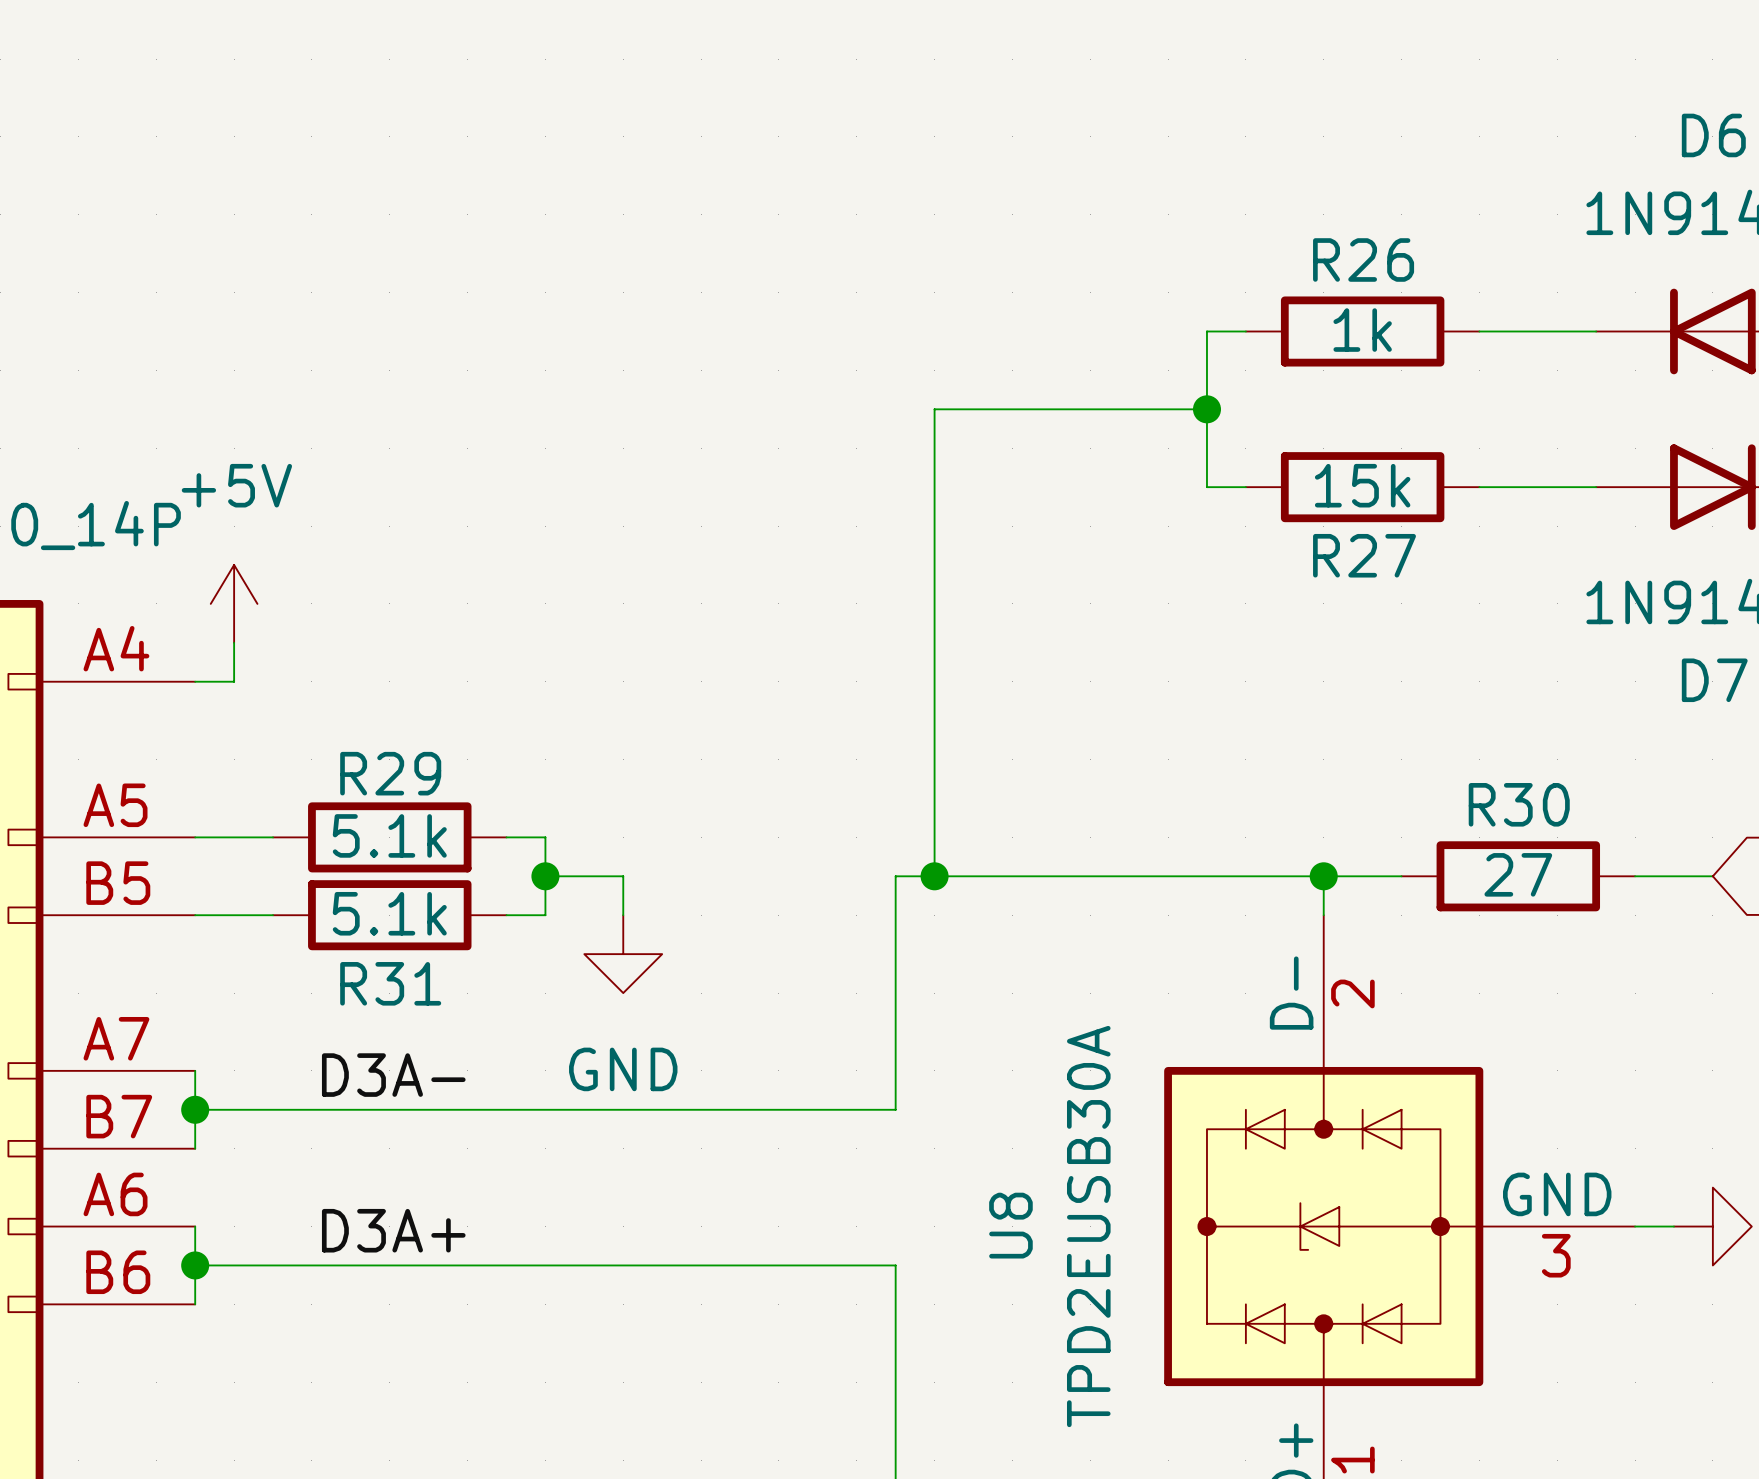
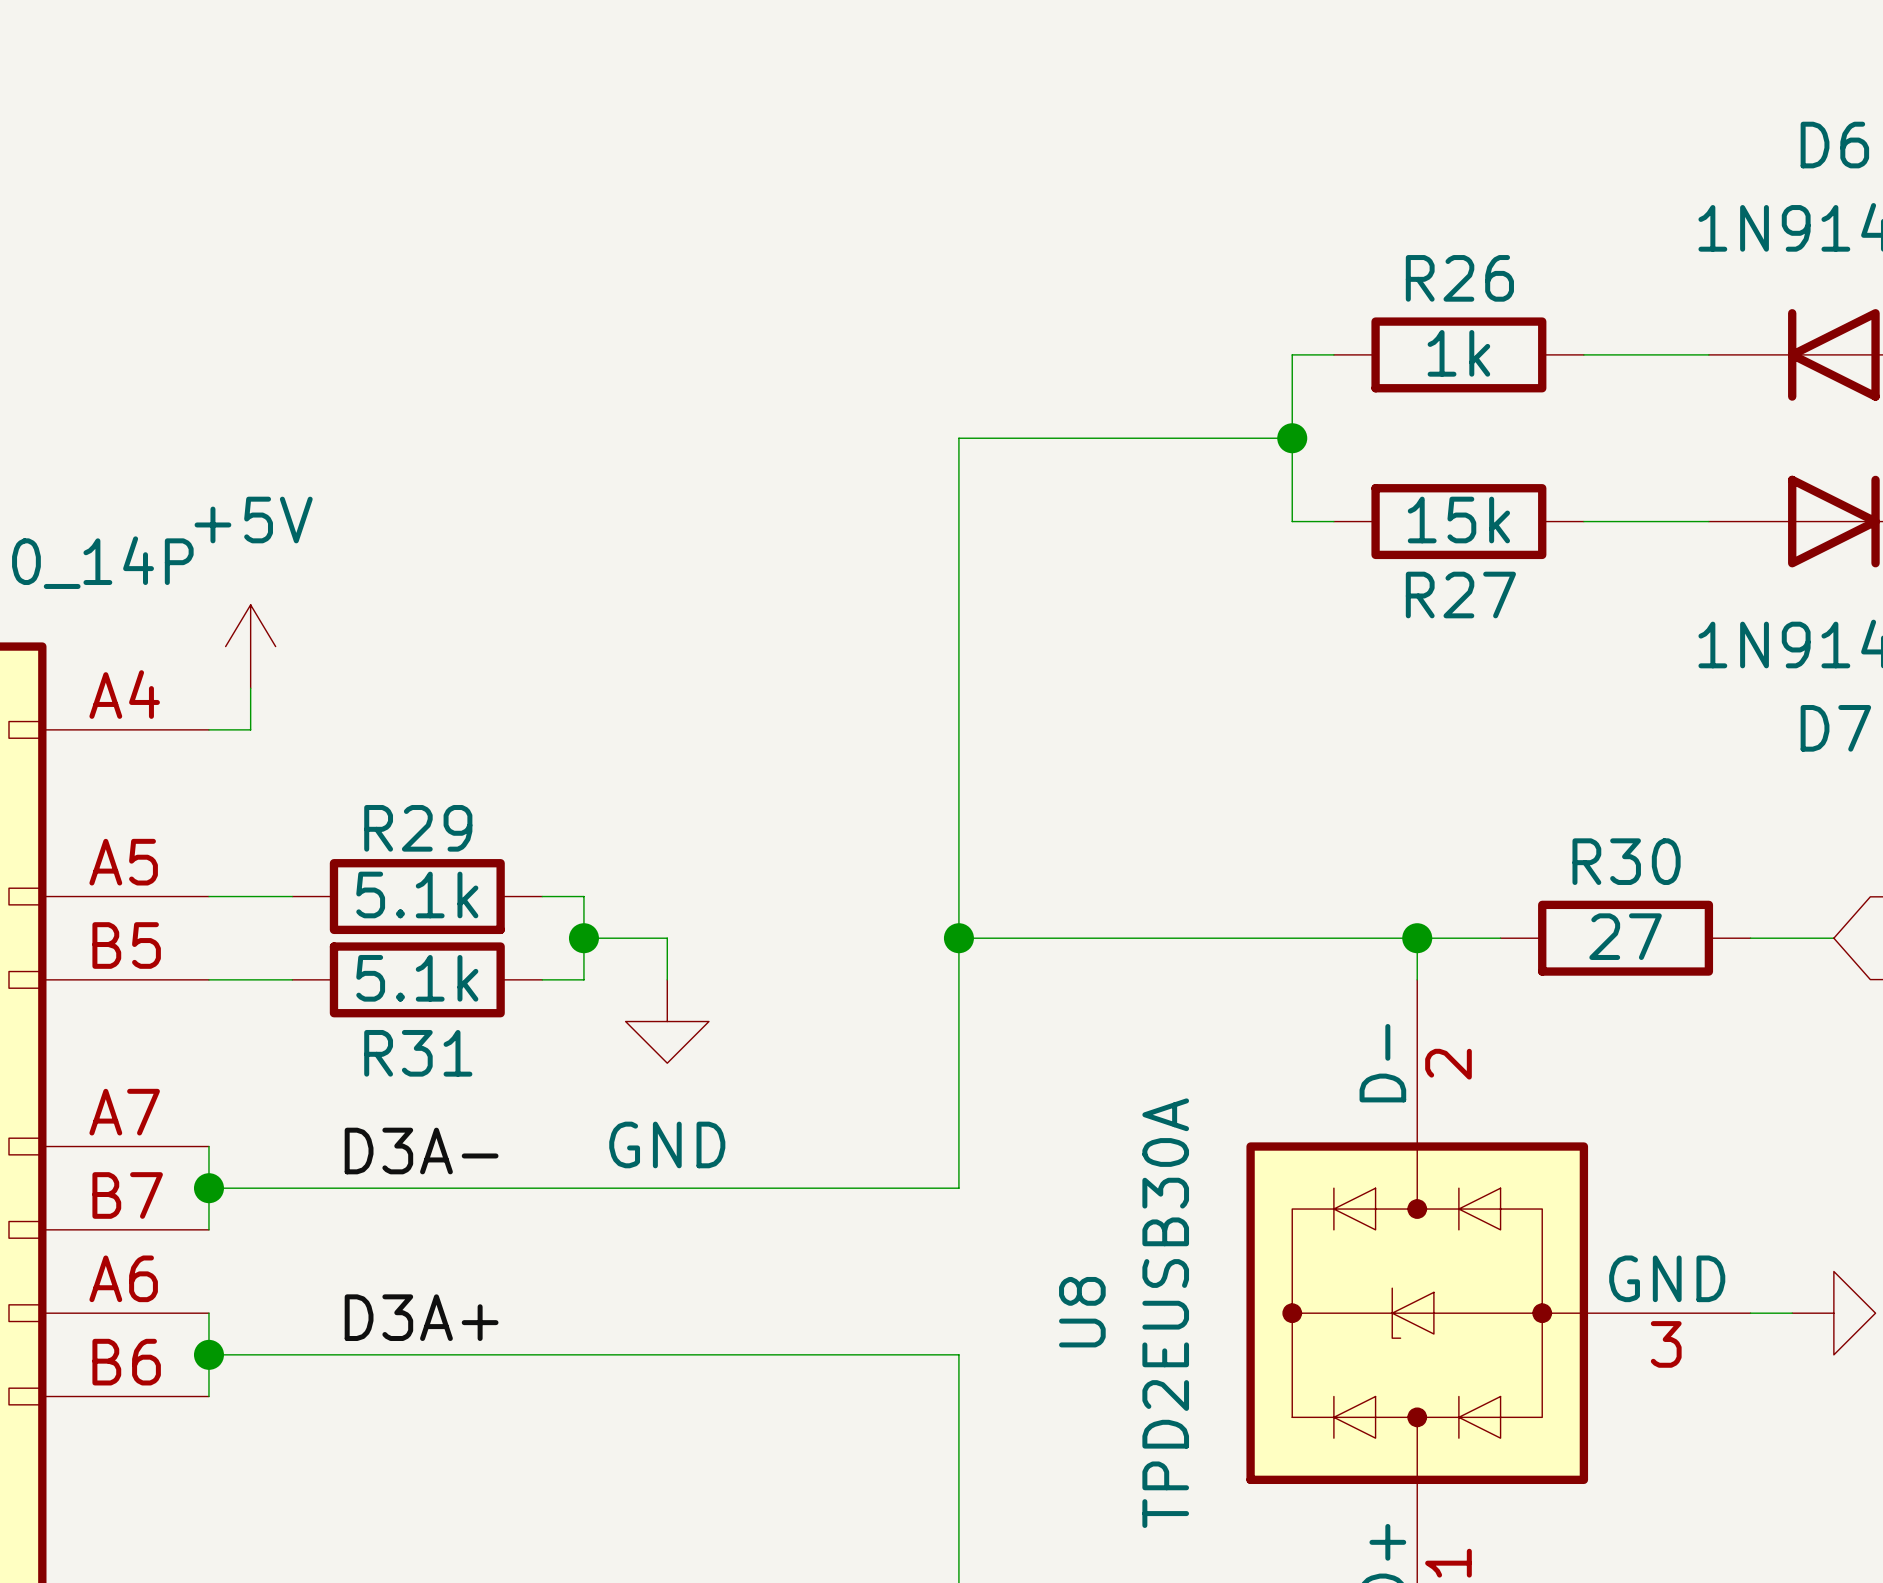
wire: (934, 409) (934, 876) -> (1000, 438) (958, 438) (958, 938)
junction position: (934, 876) -> (958, 938)

